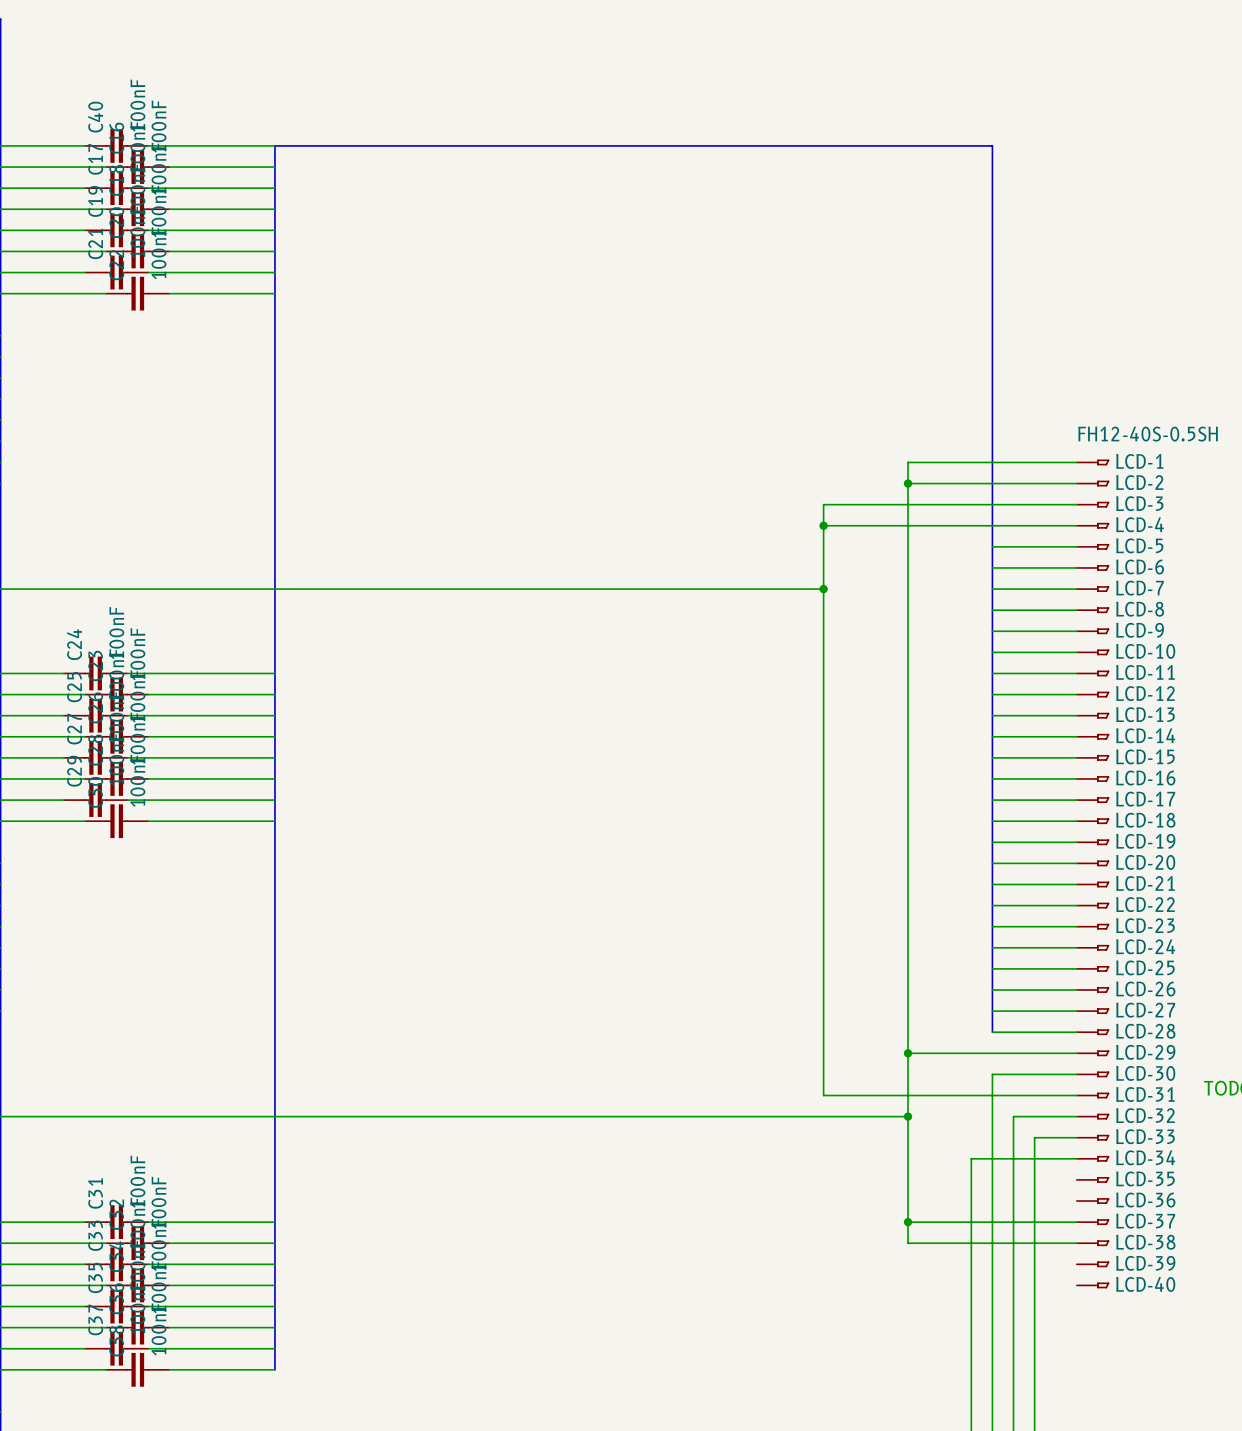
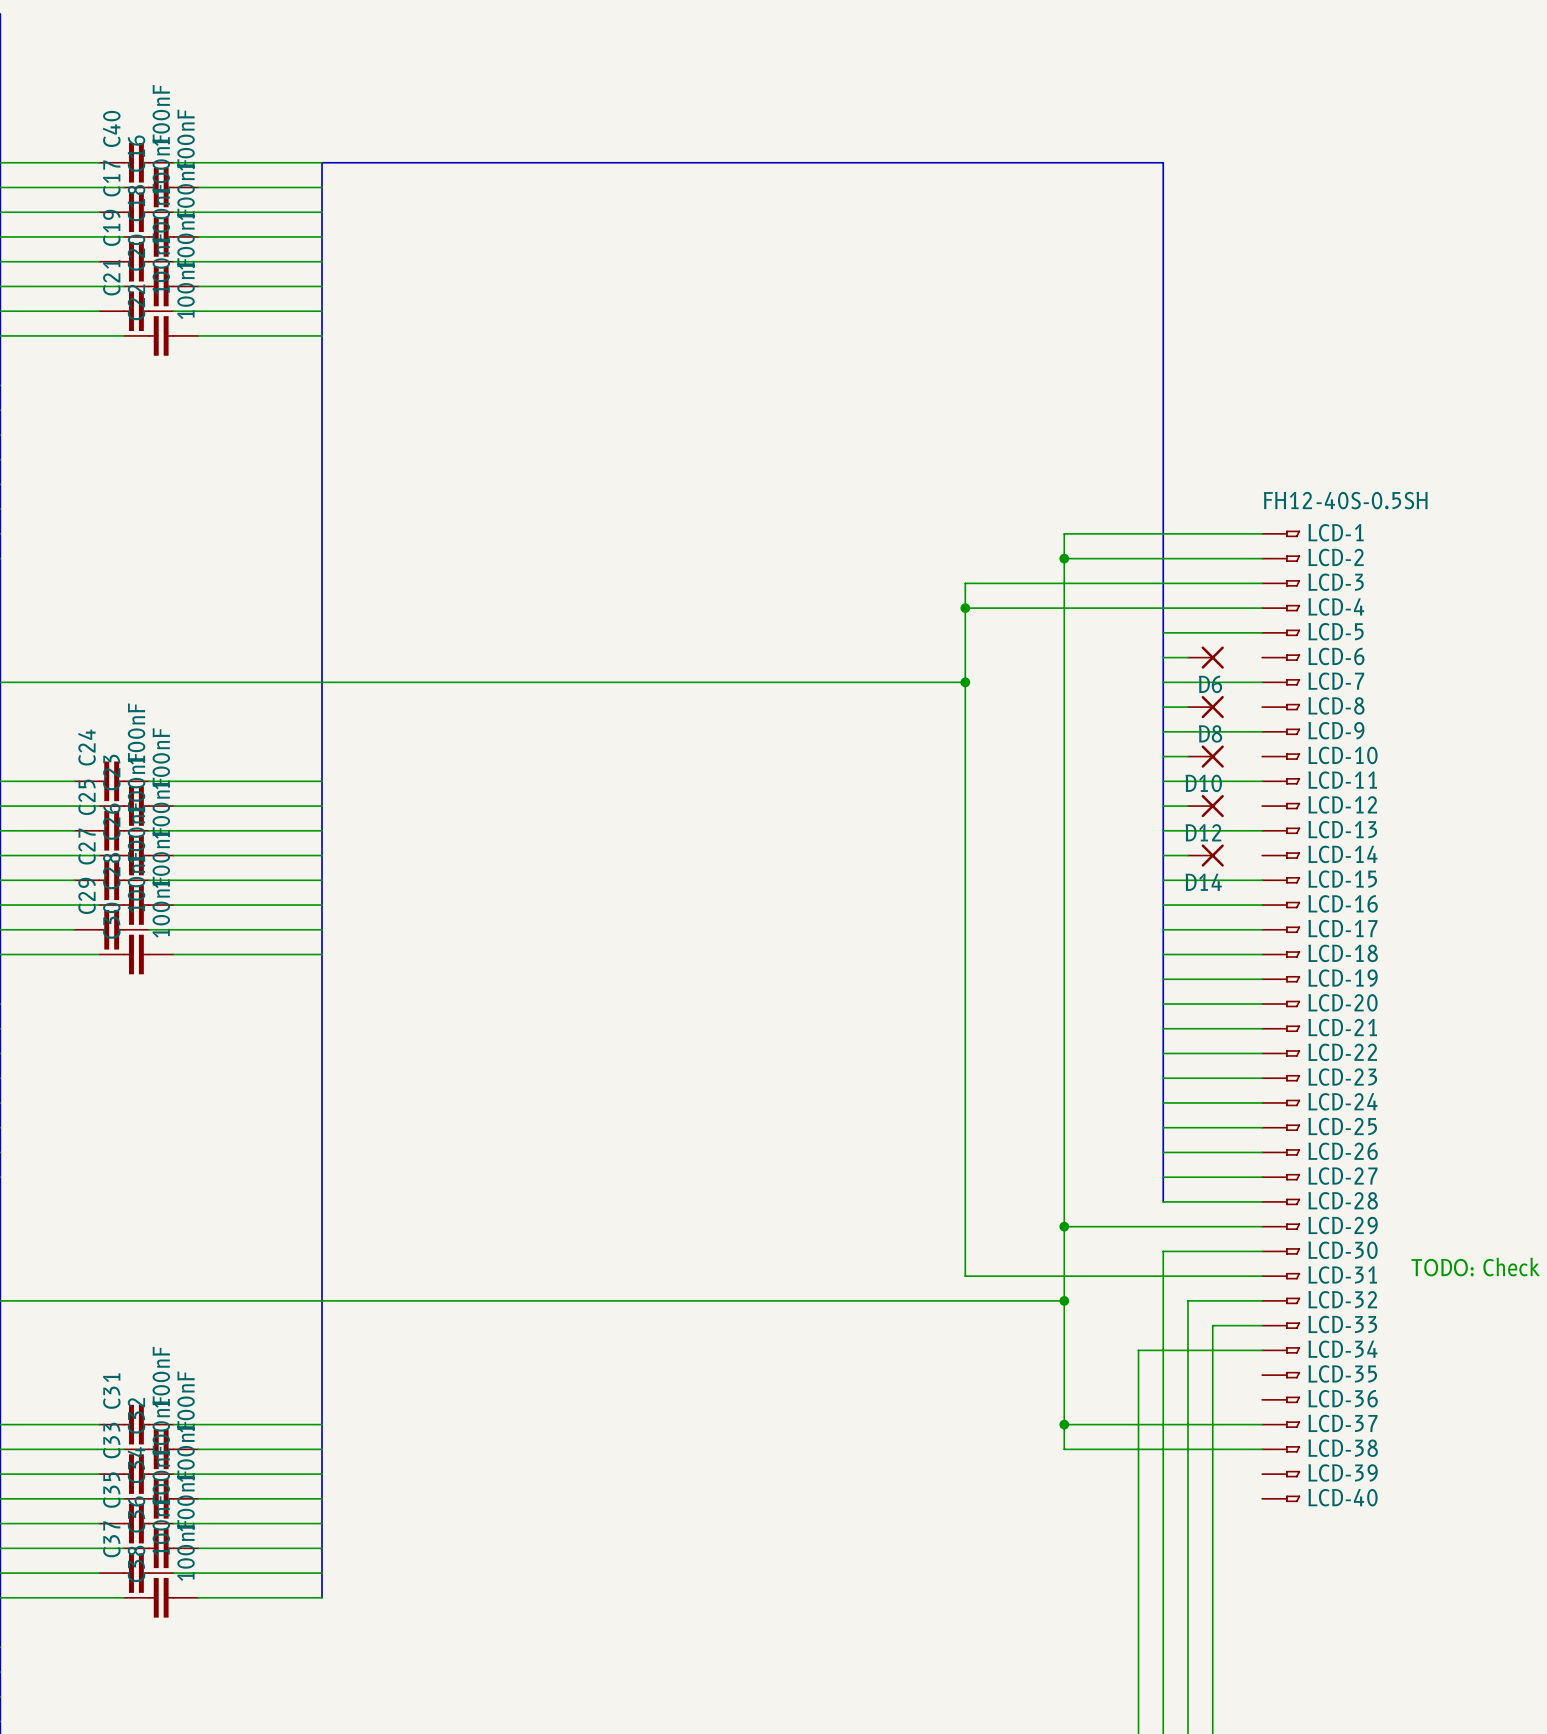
wire: (1013, 567) (1076, 567) -> none
D6: none -> (1205, 657)
wire: (1013, 610) (1076, 610) -> none
D8: none -> (1205, 707)
wire: (1013, 652) (1076, 652) -> none
D10: none -> (1205, 756)
wire: (1013, 694) (1076, 694) -> none
D12: none -> (1205, 806)
wire: (1013, 736) (1076, 736) -> none
D14: none -> (1205, 855)

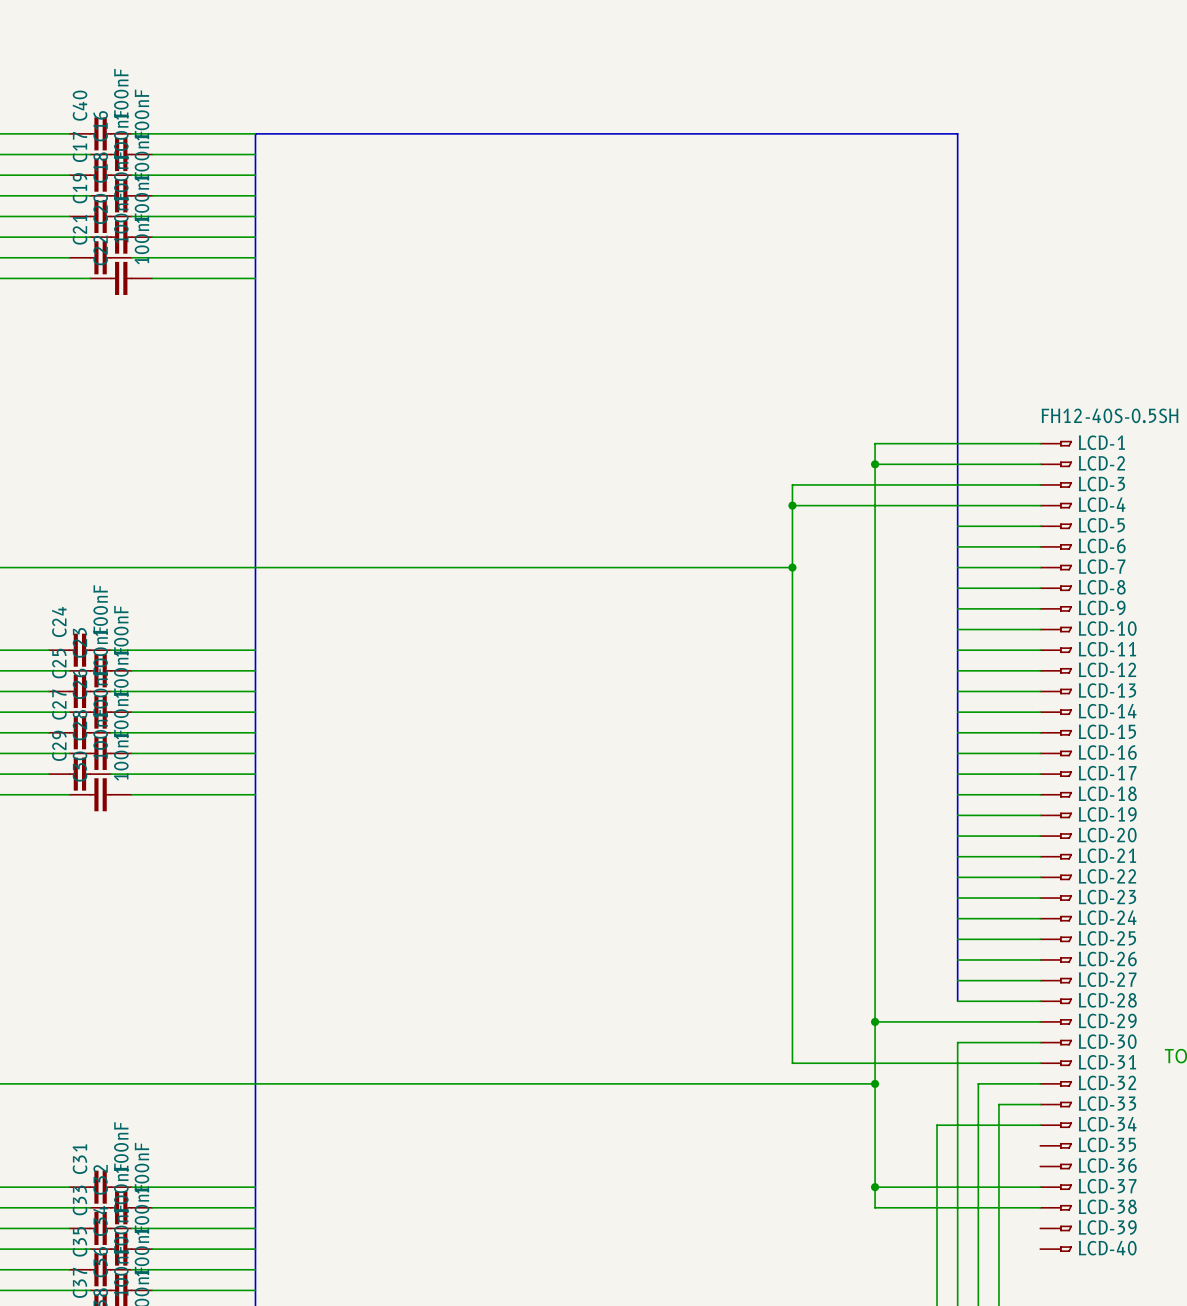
wire: none -> (978, 546) (1040, 546)
D6: (1205, 657) -> none
wire: none -> (978, 588) (1040, 588)
D8: (1205, 707) -> none
wire: none -> (978, 629) (1040, 629)
D10: (1205, 756) -> none
wire: none -> (978, 670) (1040, 670)
D12: (1205, 806) -> none
wire: none -> (978, 712) (1040, 712)
D14: (1205, 855) -> none

